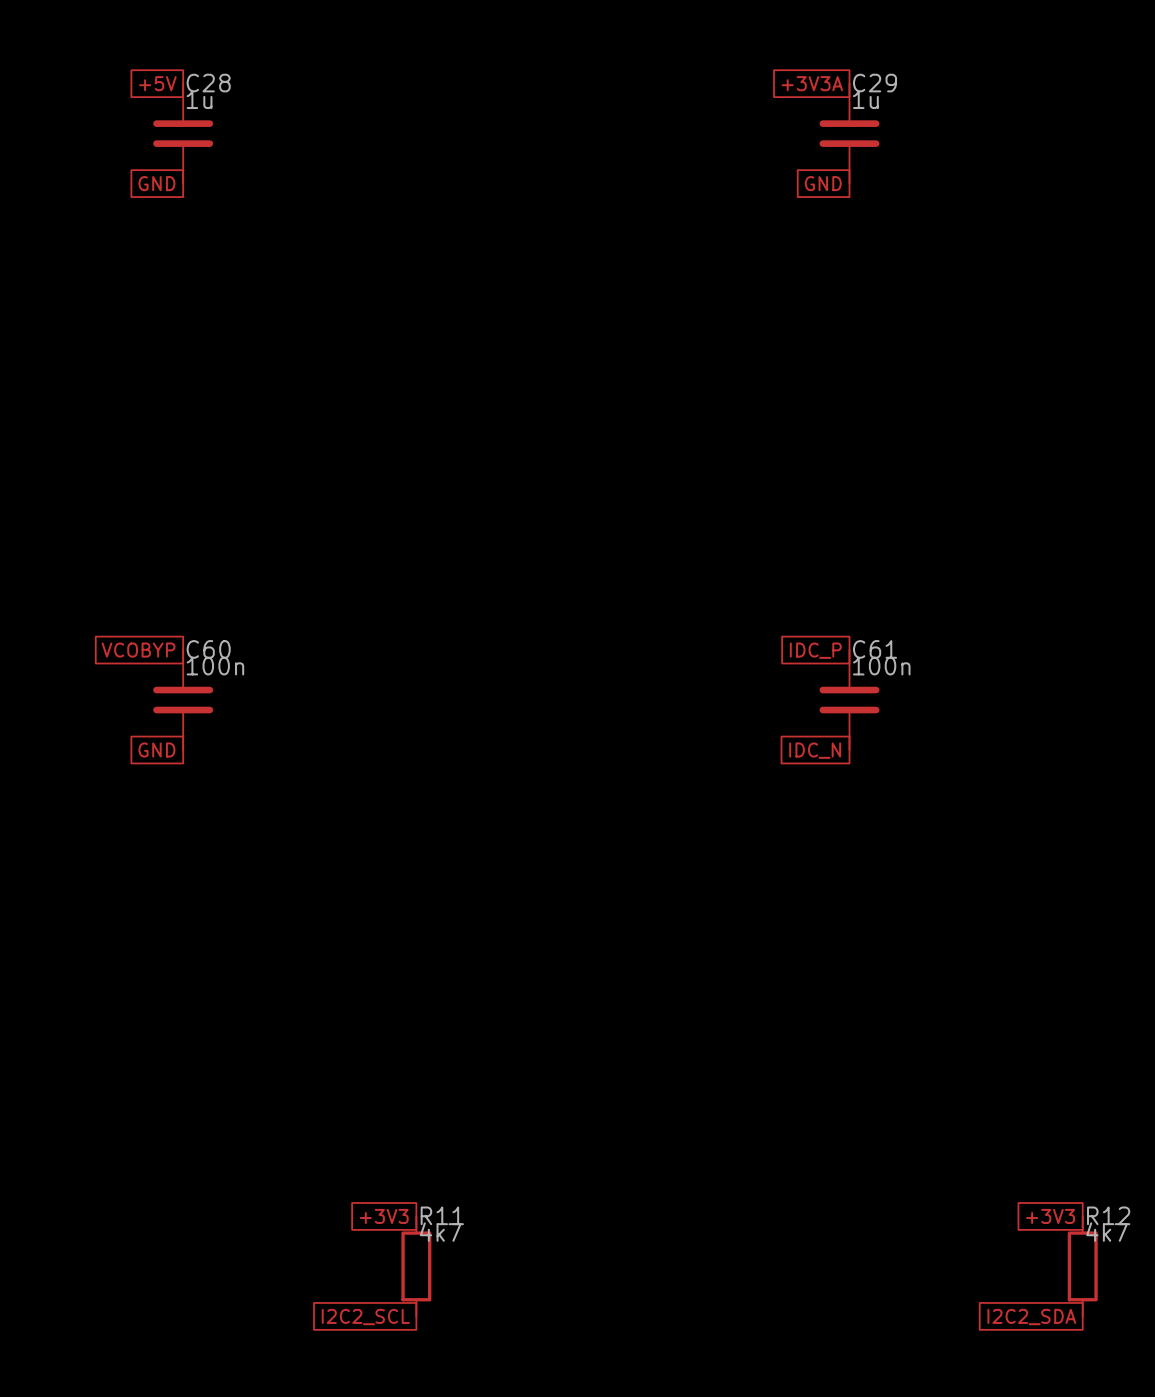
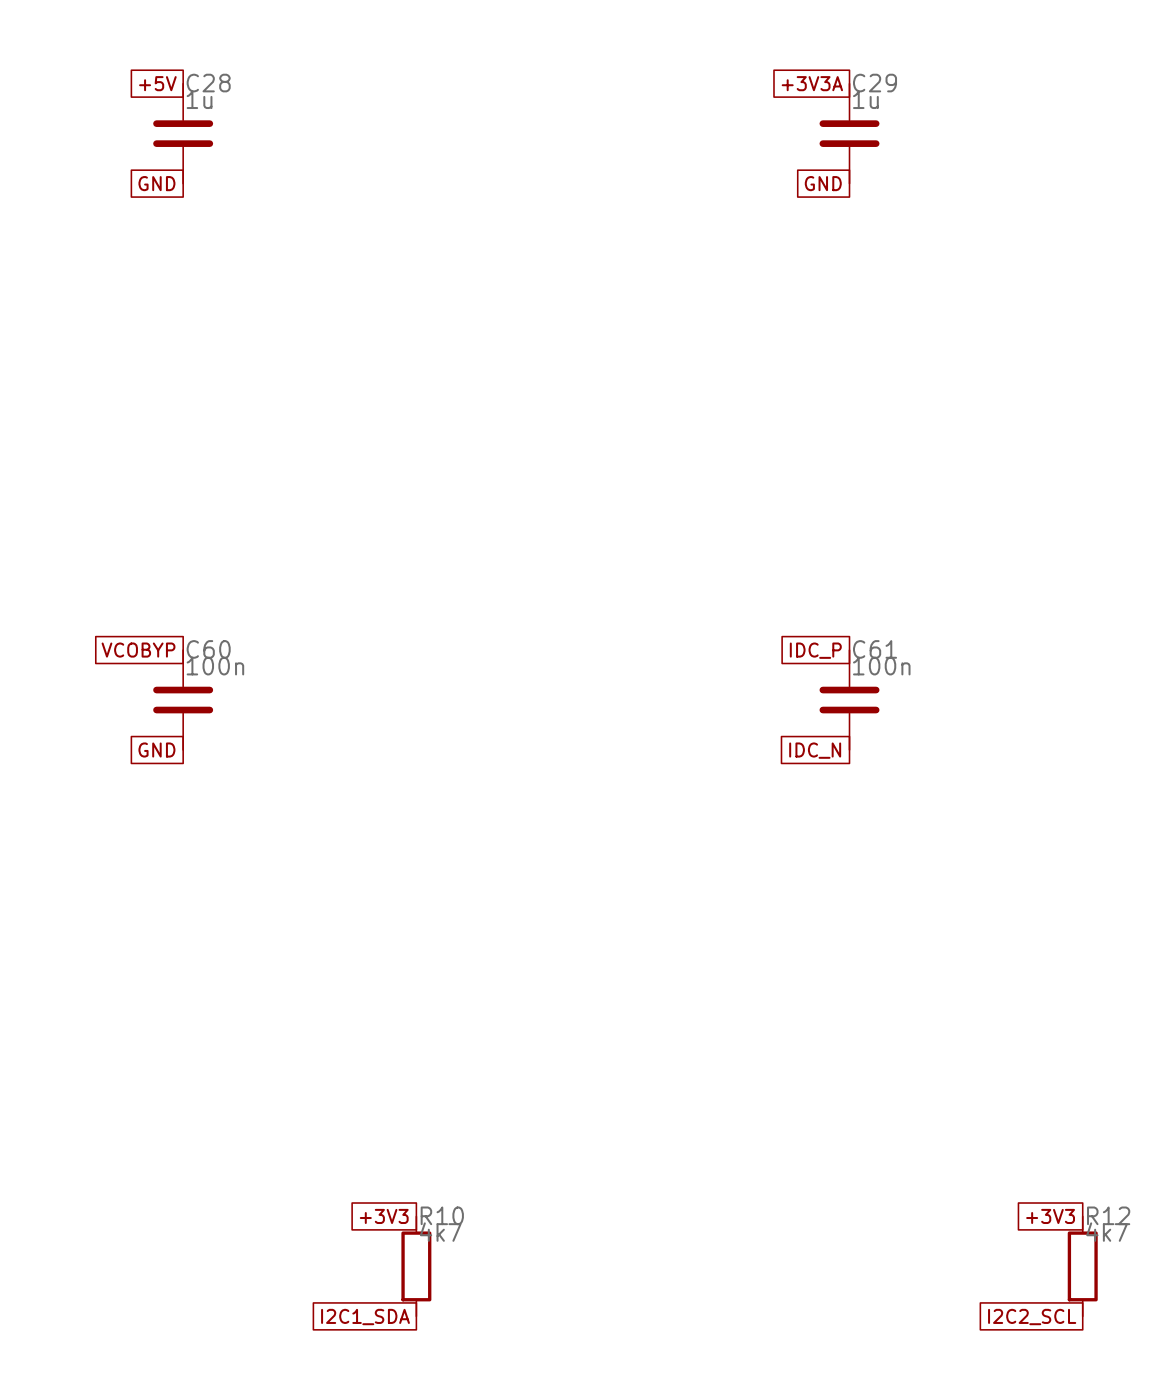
R11 name: R11 (442, 1215) -> R10 (442, 1215)
global label: I2C2_SCL (365, 1317) -> I2C1_SDA (365, 1317)
global label: I2C2_SDA (1031, 1317) -> I2C2_SCL (1032, 1317)

